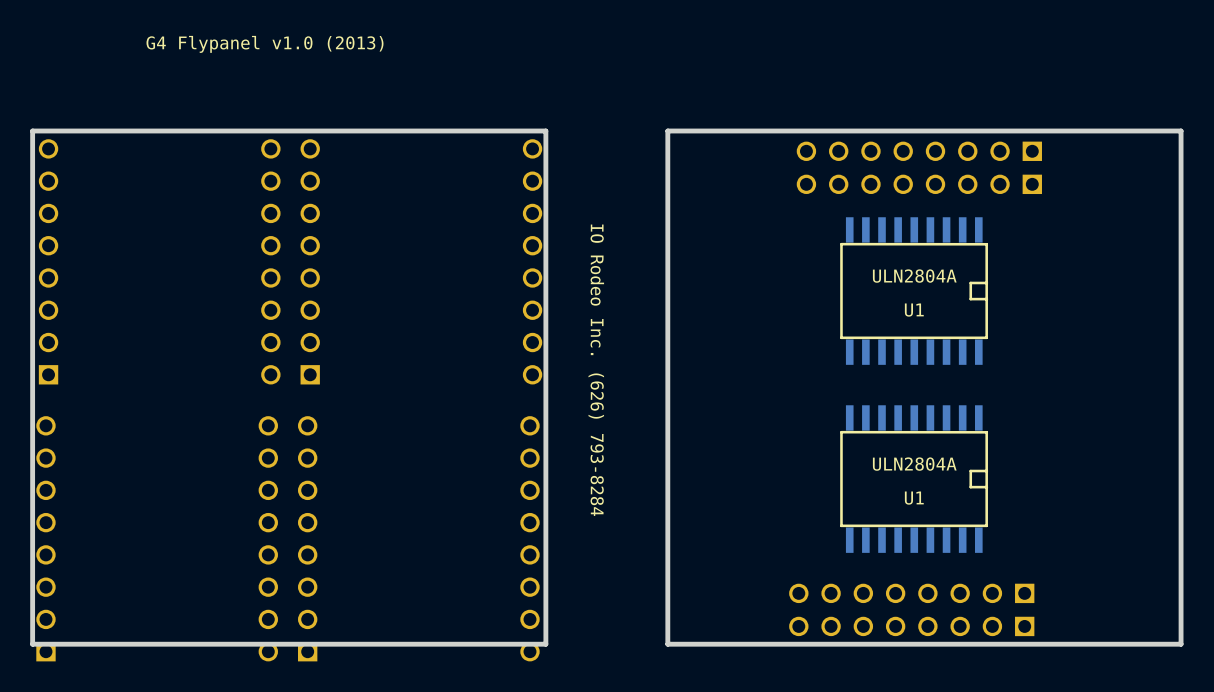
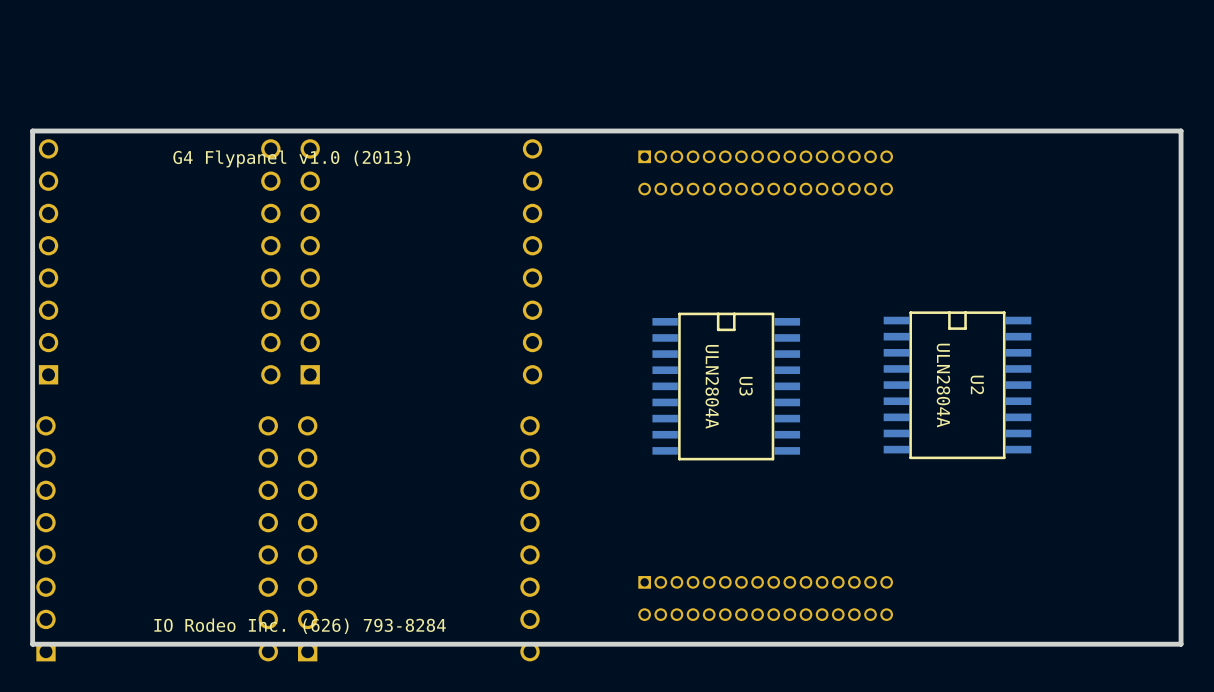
text position: G4 Flypanel v1.0 (2013) (264, 44) -> G4 Flypanel v1.0 (2013) (291, 158)
board edge: (545, 131) (545, 644) -> (667, 644) (545, 644)
board edge: (667, 131) (667, 644) -> (667, 131) (545, 131)
part: (919, 151) -> none
part: none -> (765, 172)
part: (919, 184) -> none
U1: ULN2804A (914, 291) -> none
text: IO Rodeo Inc. (626) 793-8284 (596, 370) -> none
U2: none -> ULN2804A (957, 385)
U3: none -> ULN2804A (726, 386)
U1: ULN2804A (914, 479) -> none
part: (911, 593) -> none
part: none -> (765, 598)
text: none -> IO Rodeo Inc. (626) 793-8284 (300, 626)
part: (911, 626) -> none

